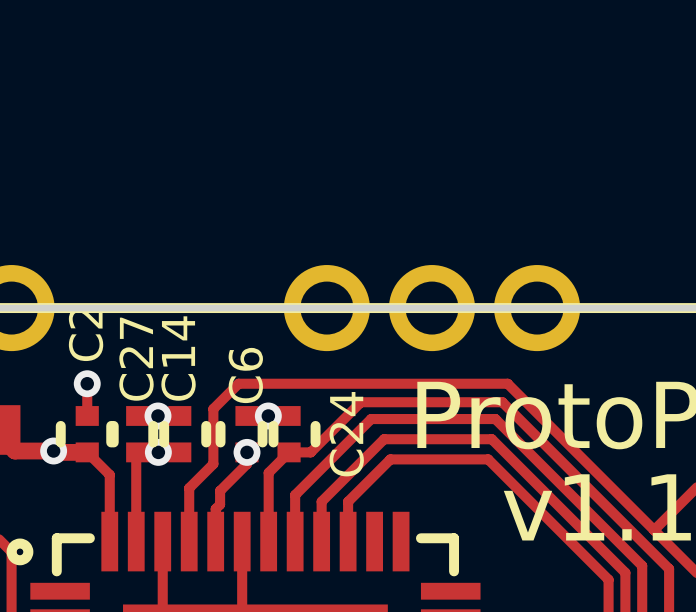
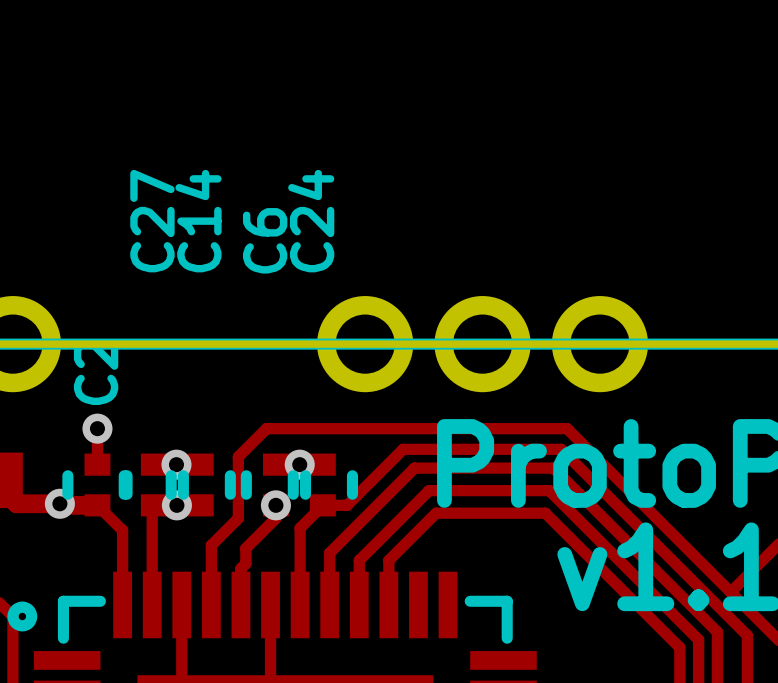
C14 name position: C14 (178, 358) -> C14 (198, 221)
C27 name position: C27 (136, 359) -> C27 (152, 221)
C6 name position: C6 (245, 375) -> C6 (265, 240)
C24 name position: C24 (346, 434) -> C24 (311, 221)

